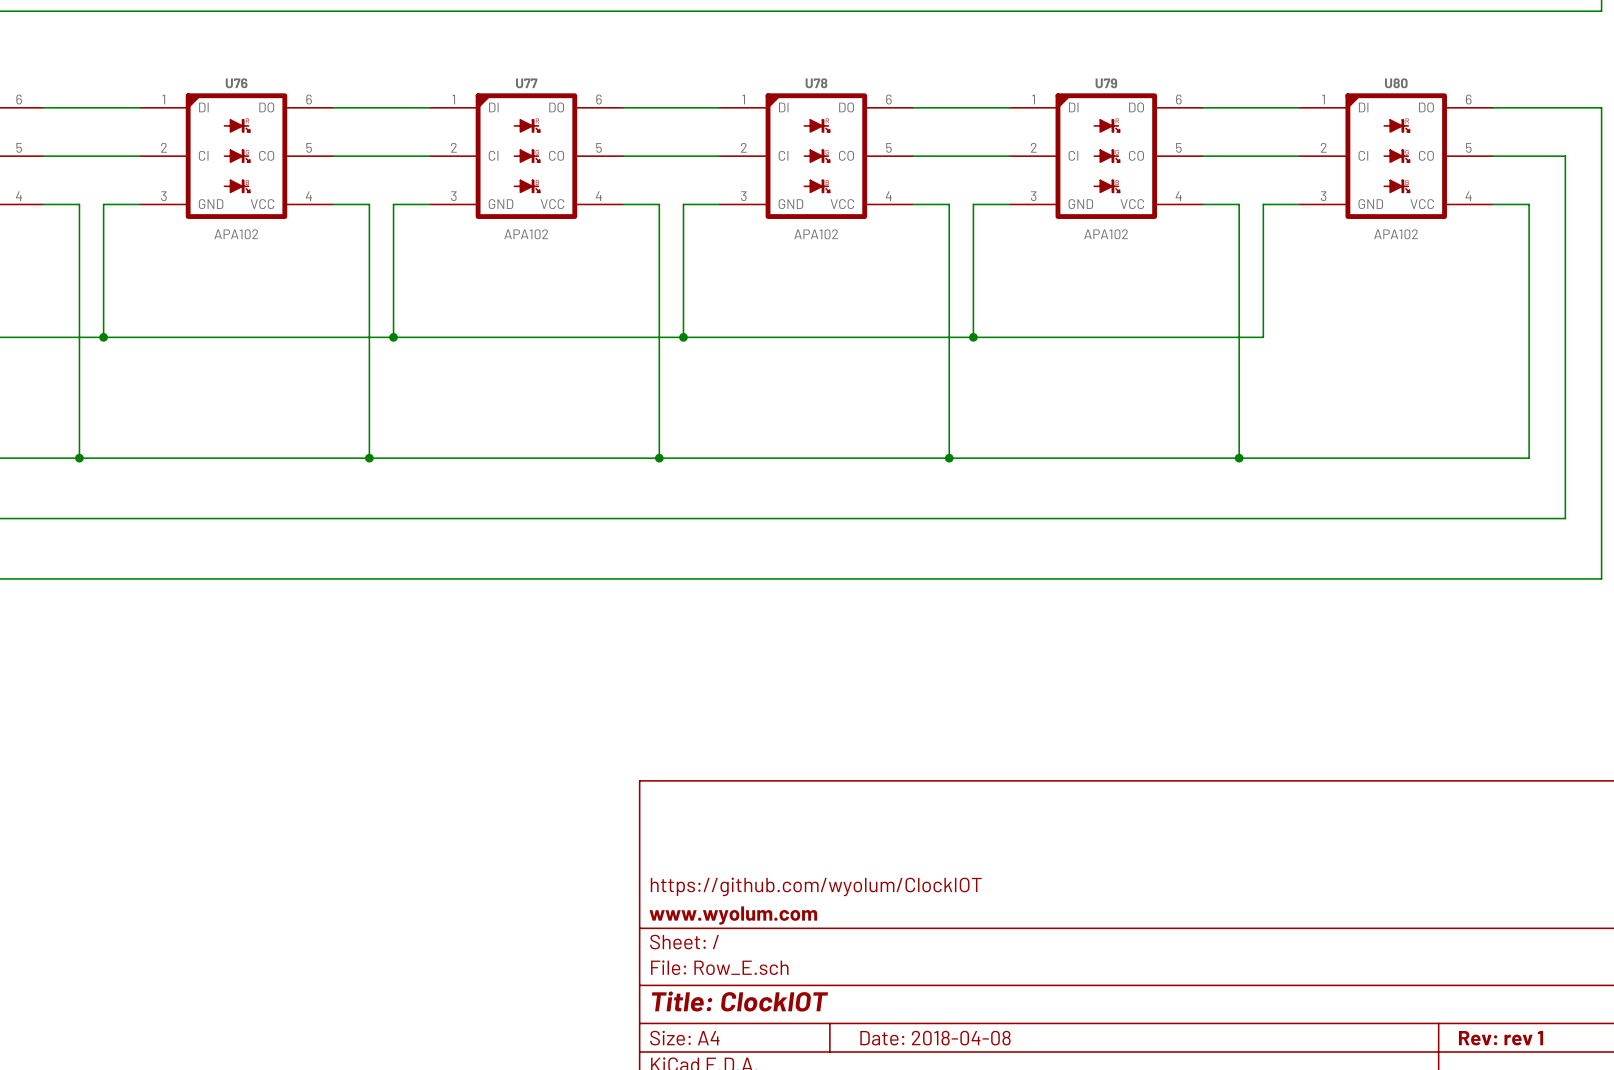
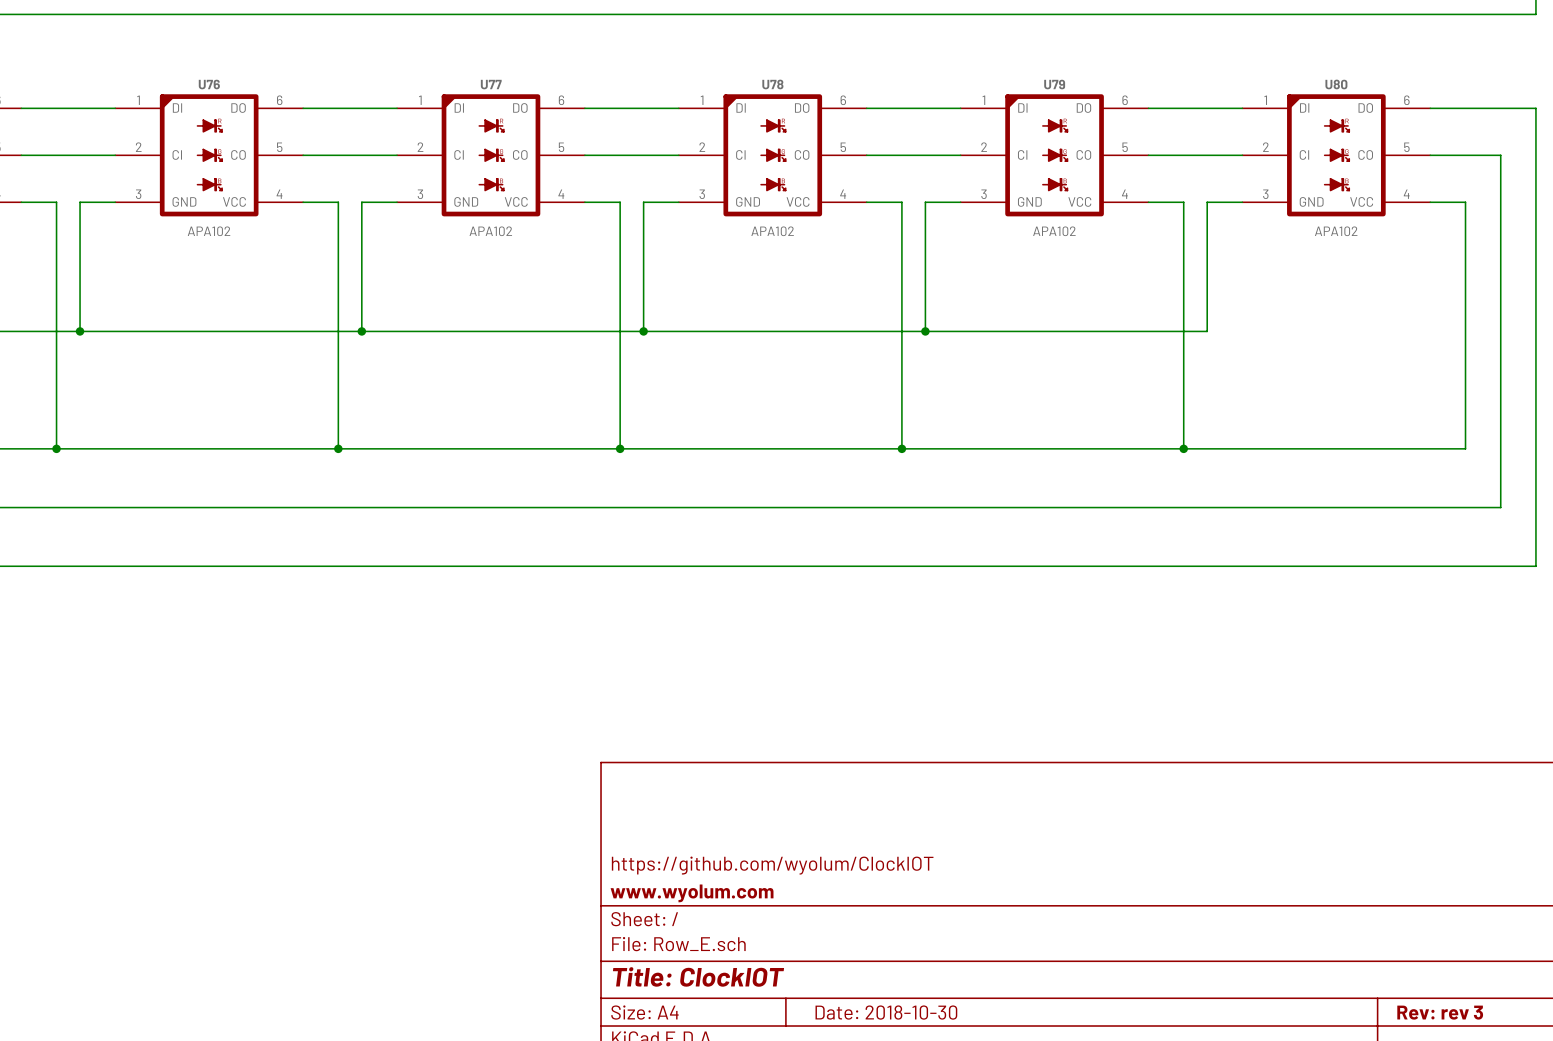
title block: Date: 2018-04-08 (935, 1038) -> Date: 2018-10-30 (886, 1012)
title block: Rev: rev 1 (1501, 1038) -> Rev: rev 3 (1440, 1012)

